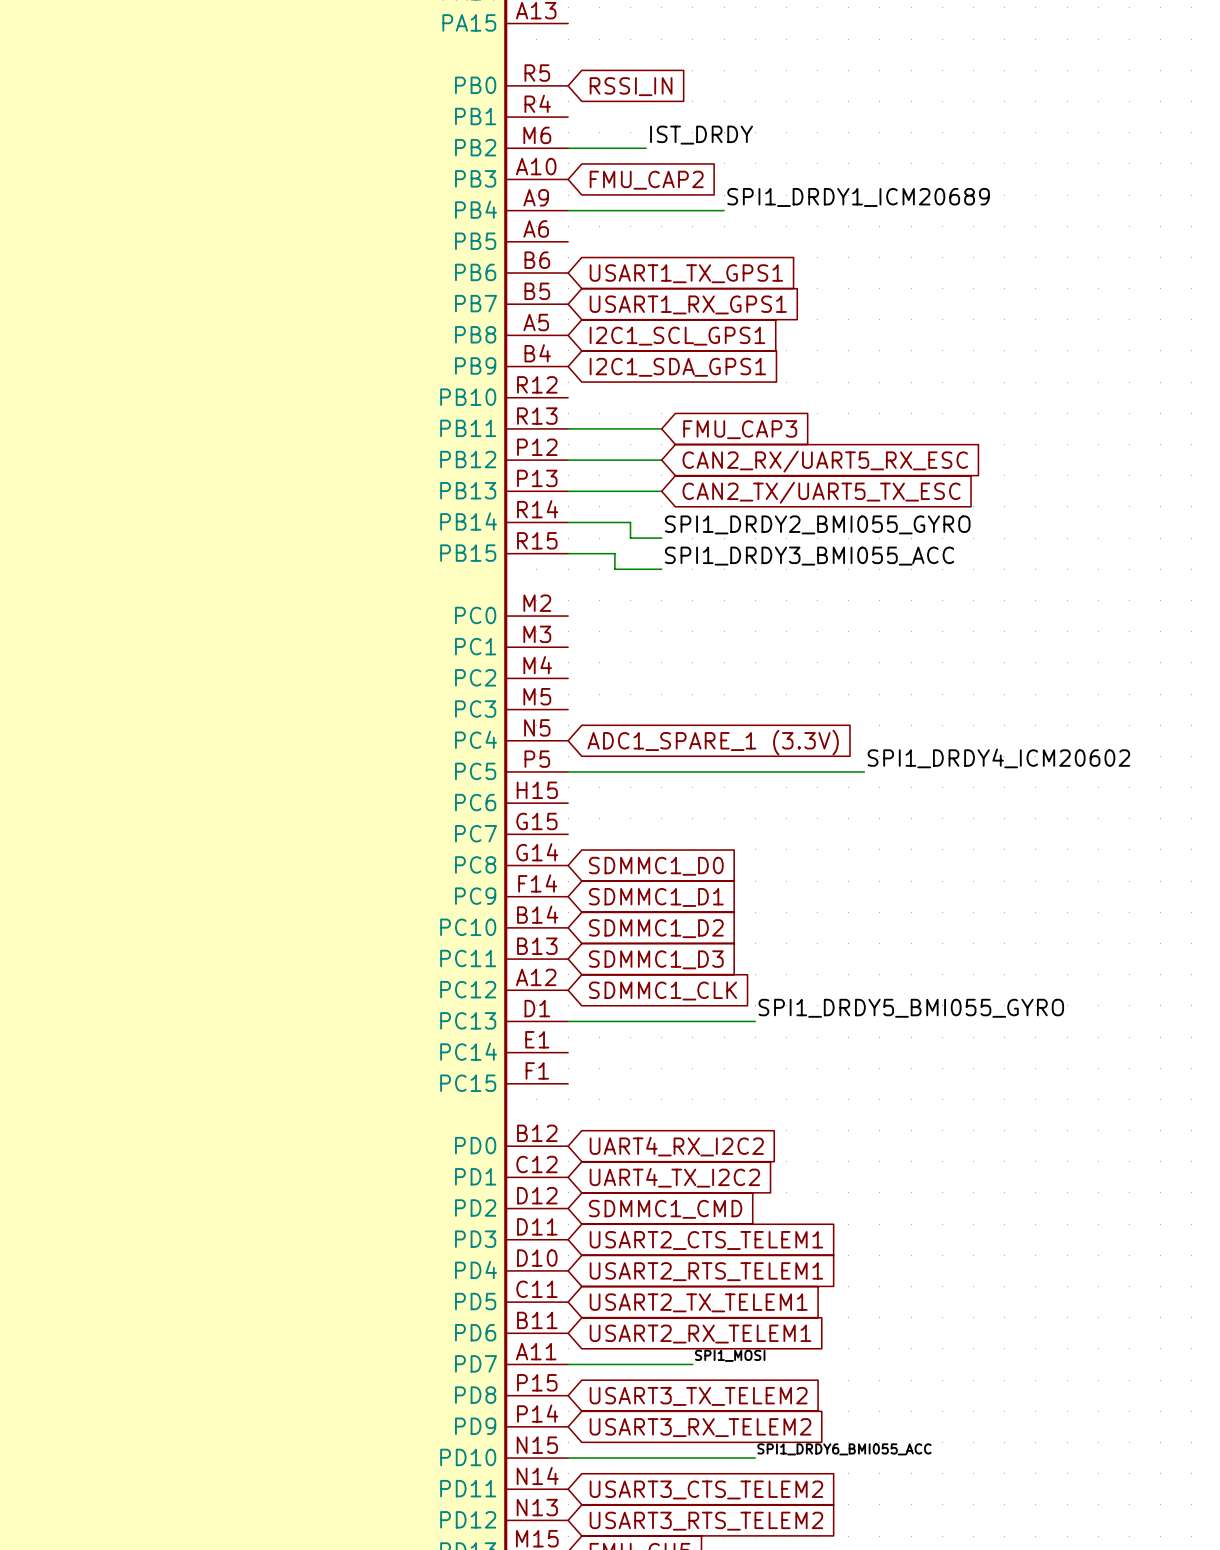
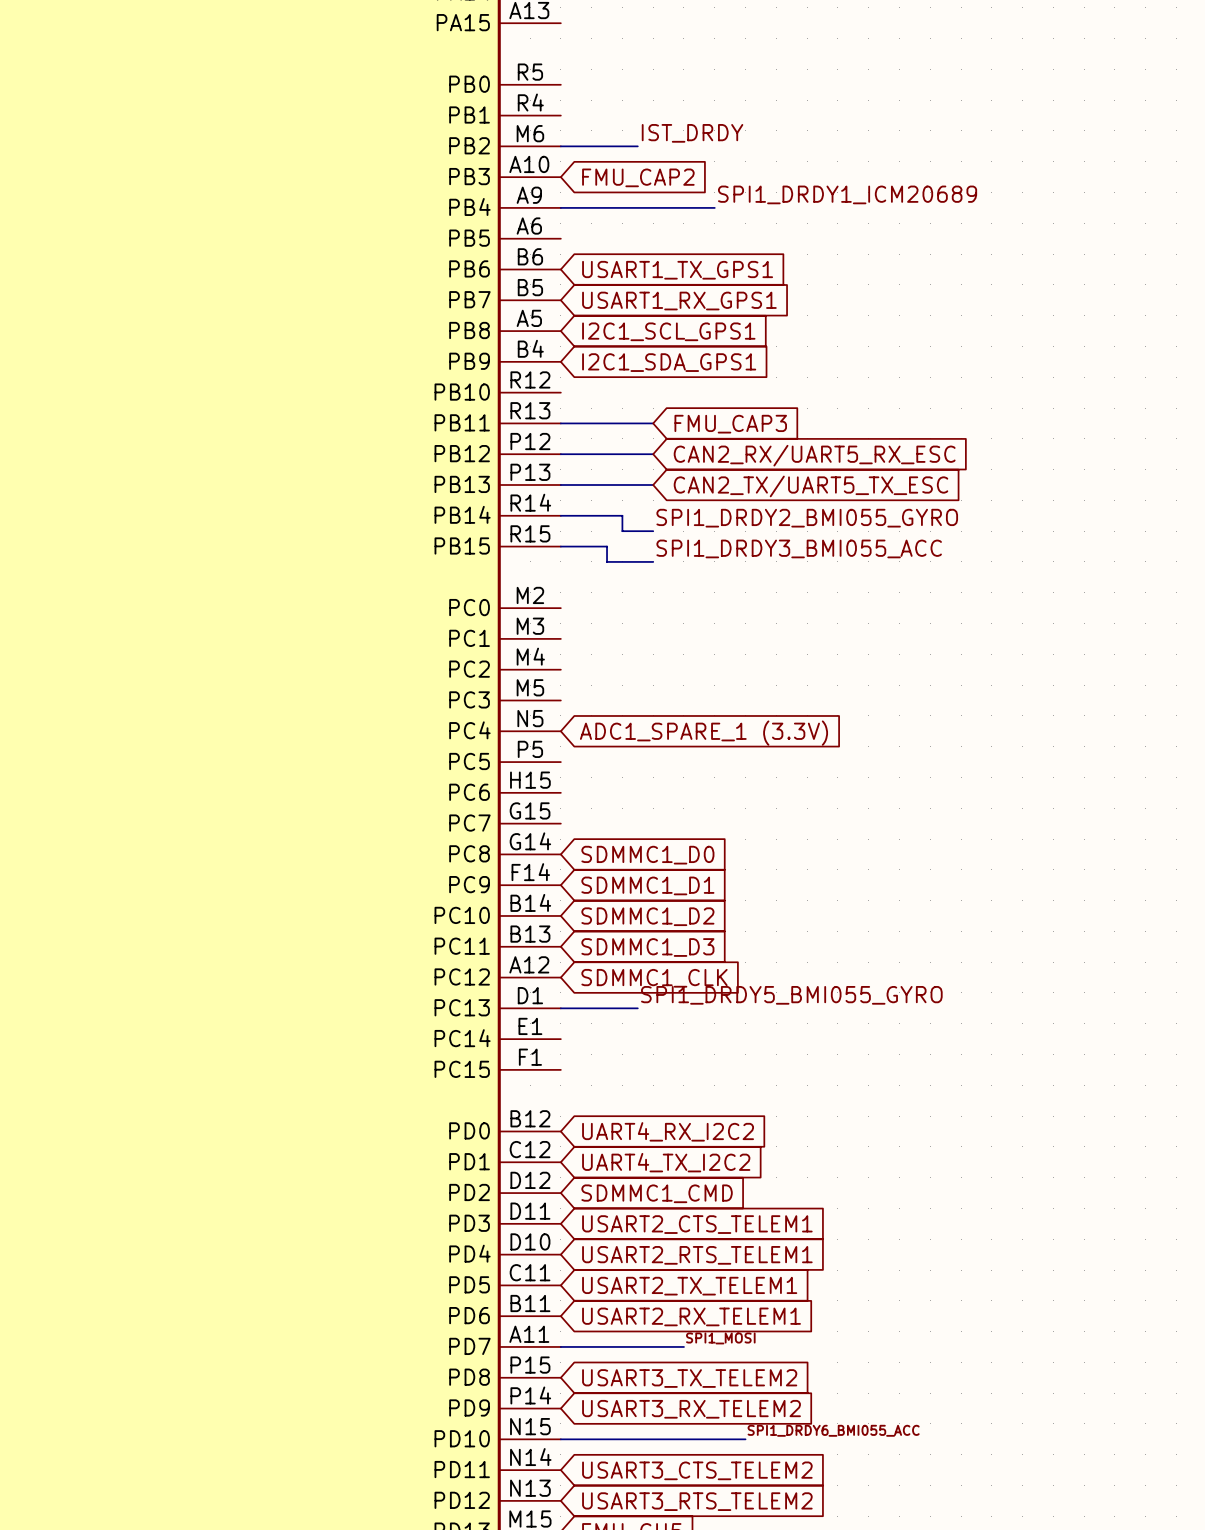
global label: RSSI_IN (631, 86) -> none
label: SPI1_DRDY4_ICM20602 (998, 758) -> none
wire: (568, 771) (864, 771) -> none
label position: SPI1_DRDY5_BMI055_GYRO (911, 1008) -> SPI1_DRDY5_BMI055_GYRO (791, 995)
wire: (646, 1021) (755, 1021) -> none

